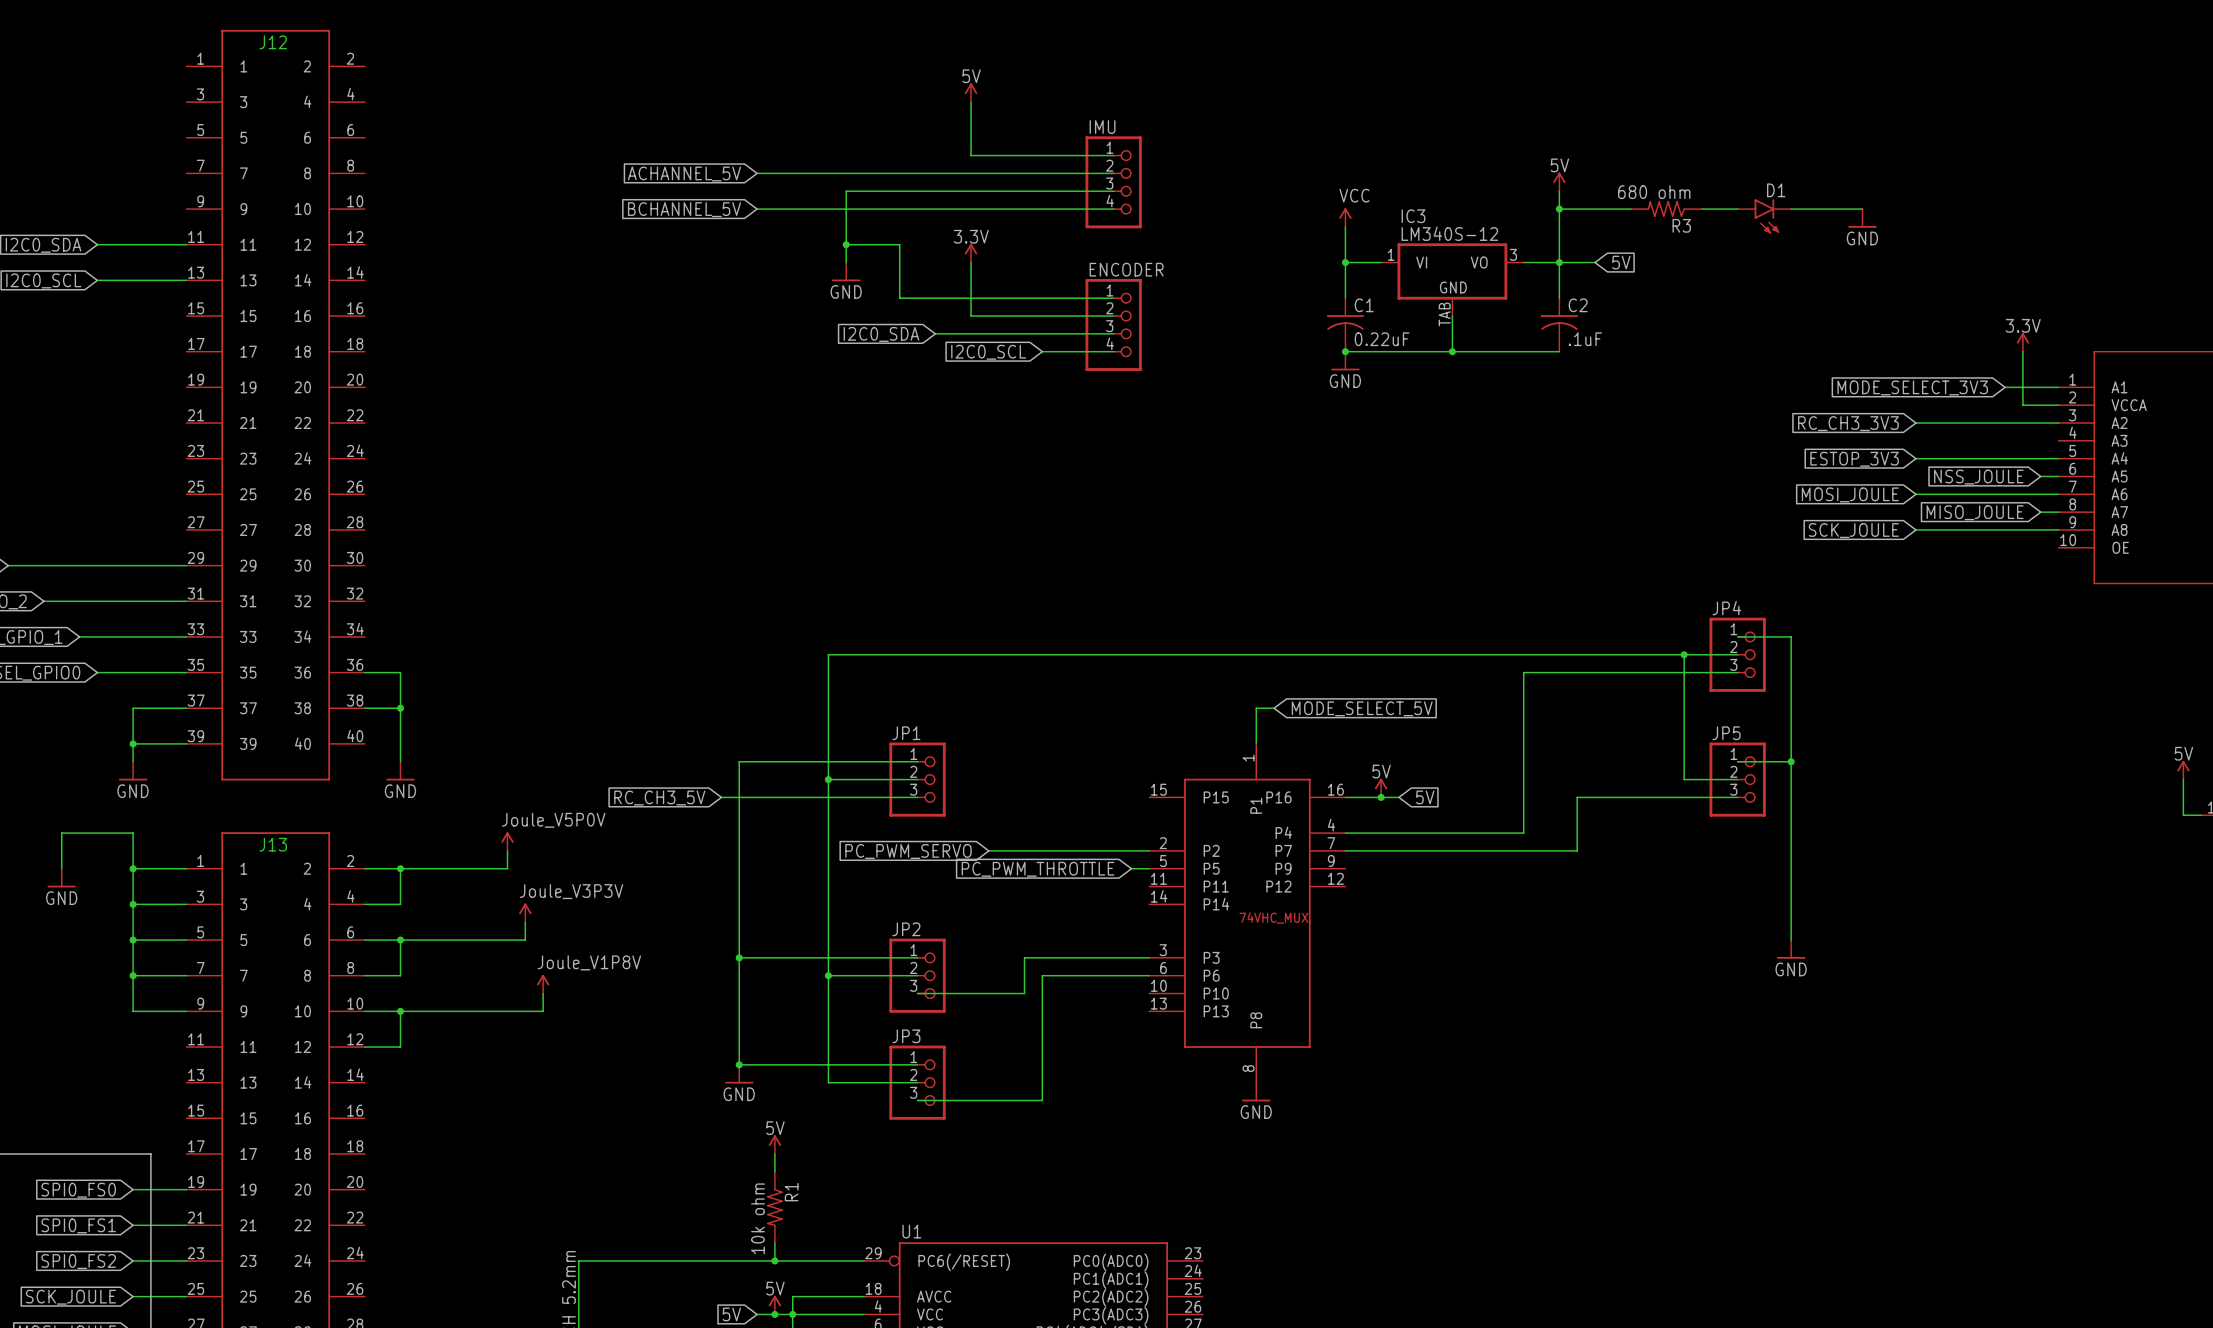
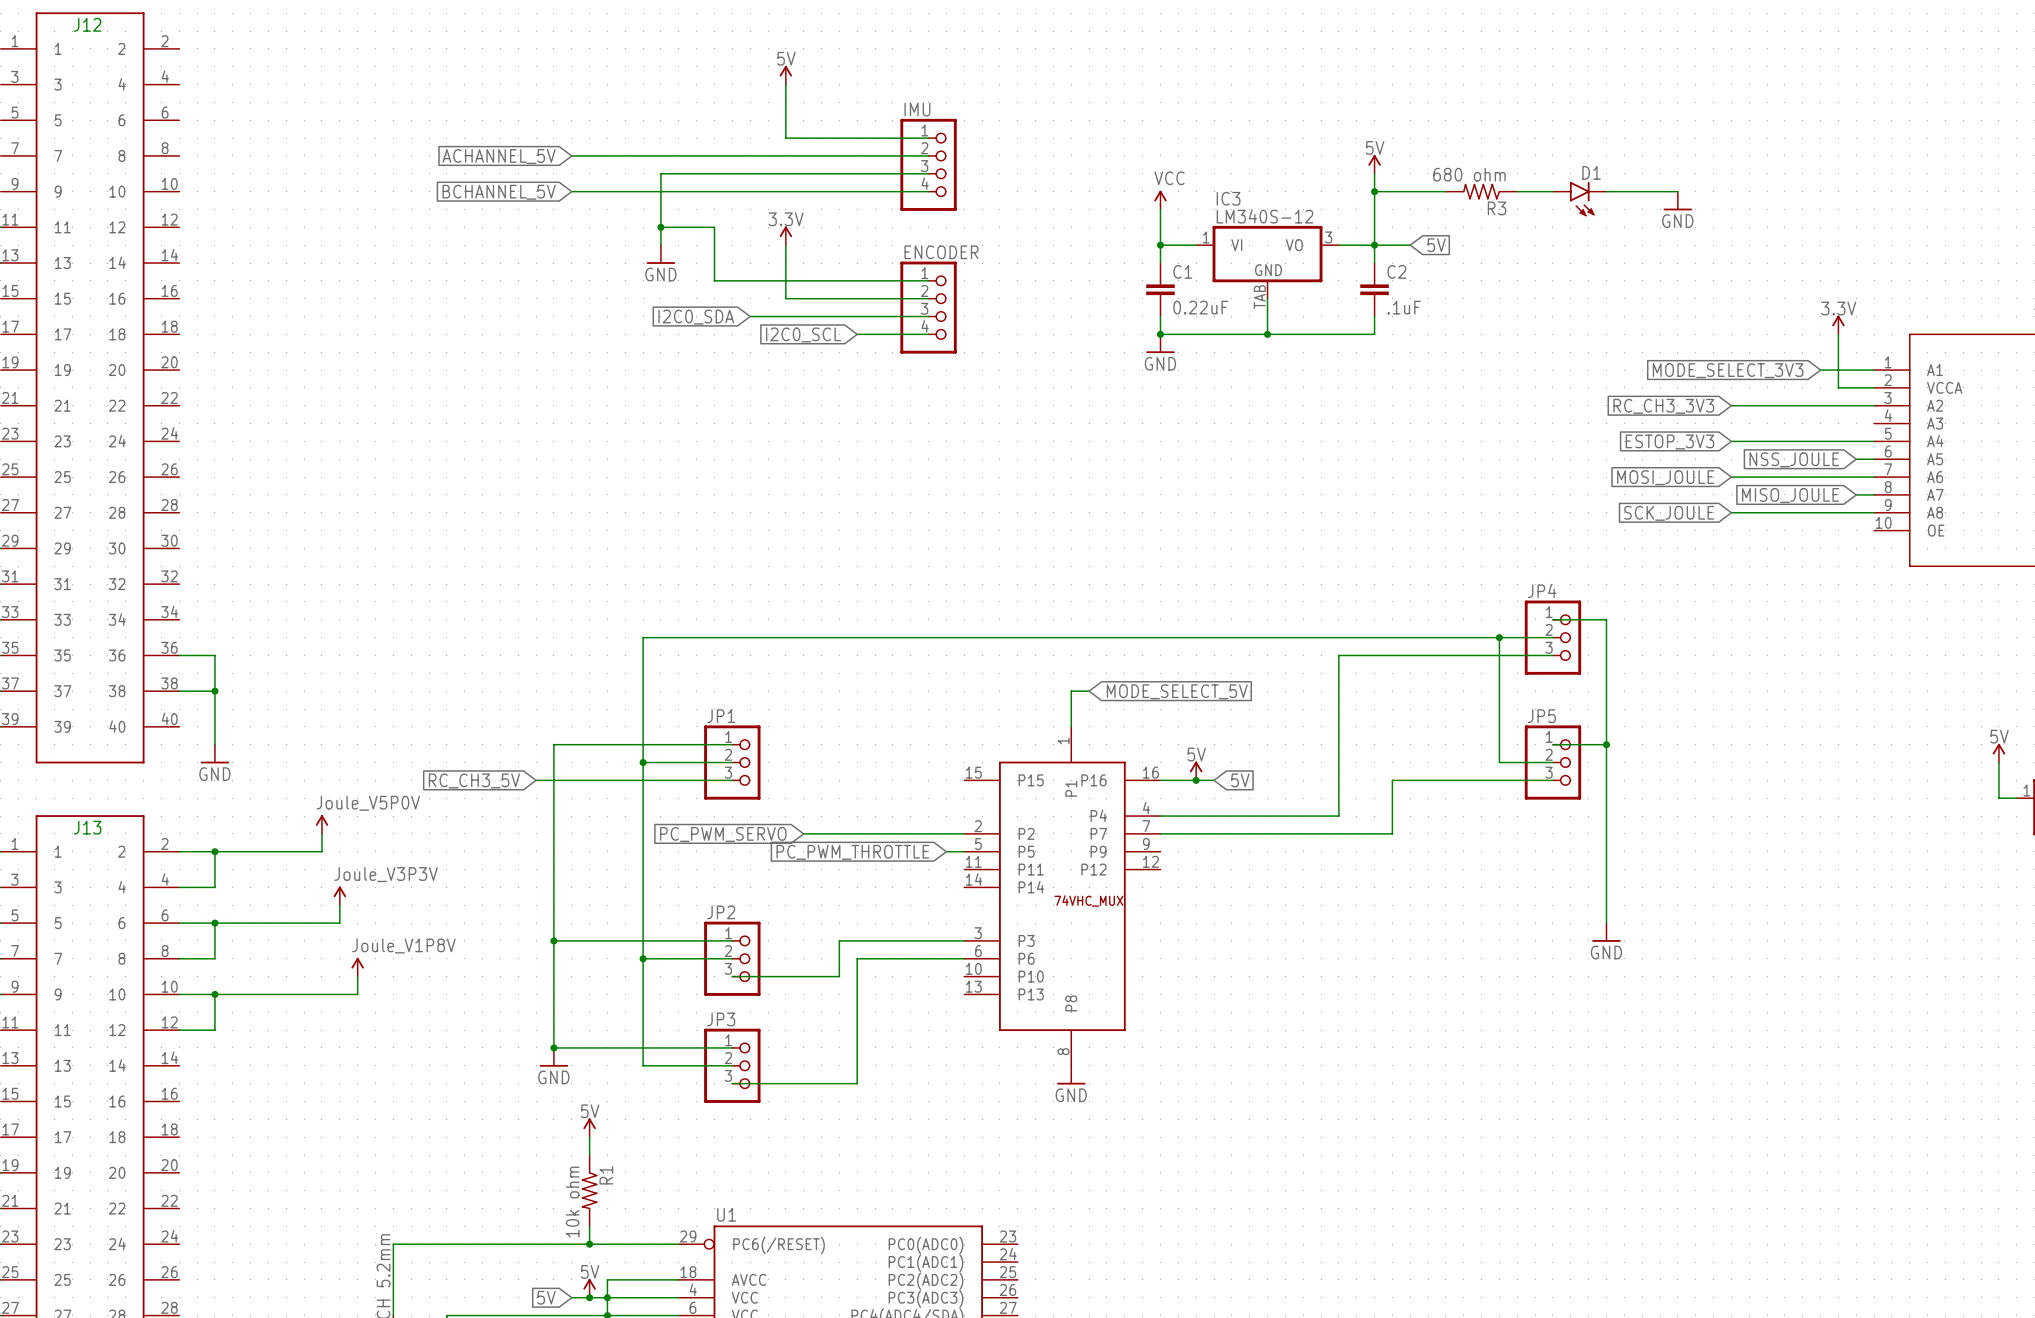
C1 symbol: [1326, 298, 1365, 352] -> [1146, 263, 1175, 317]
C2 symbol: [1540, 298, 1579, 352] -> [1360, 263, 1389, 317]

